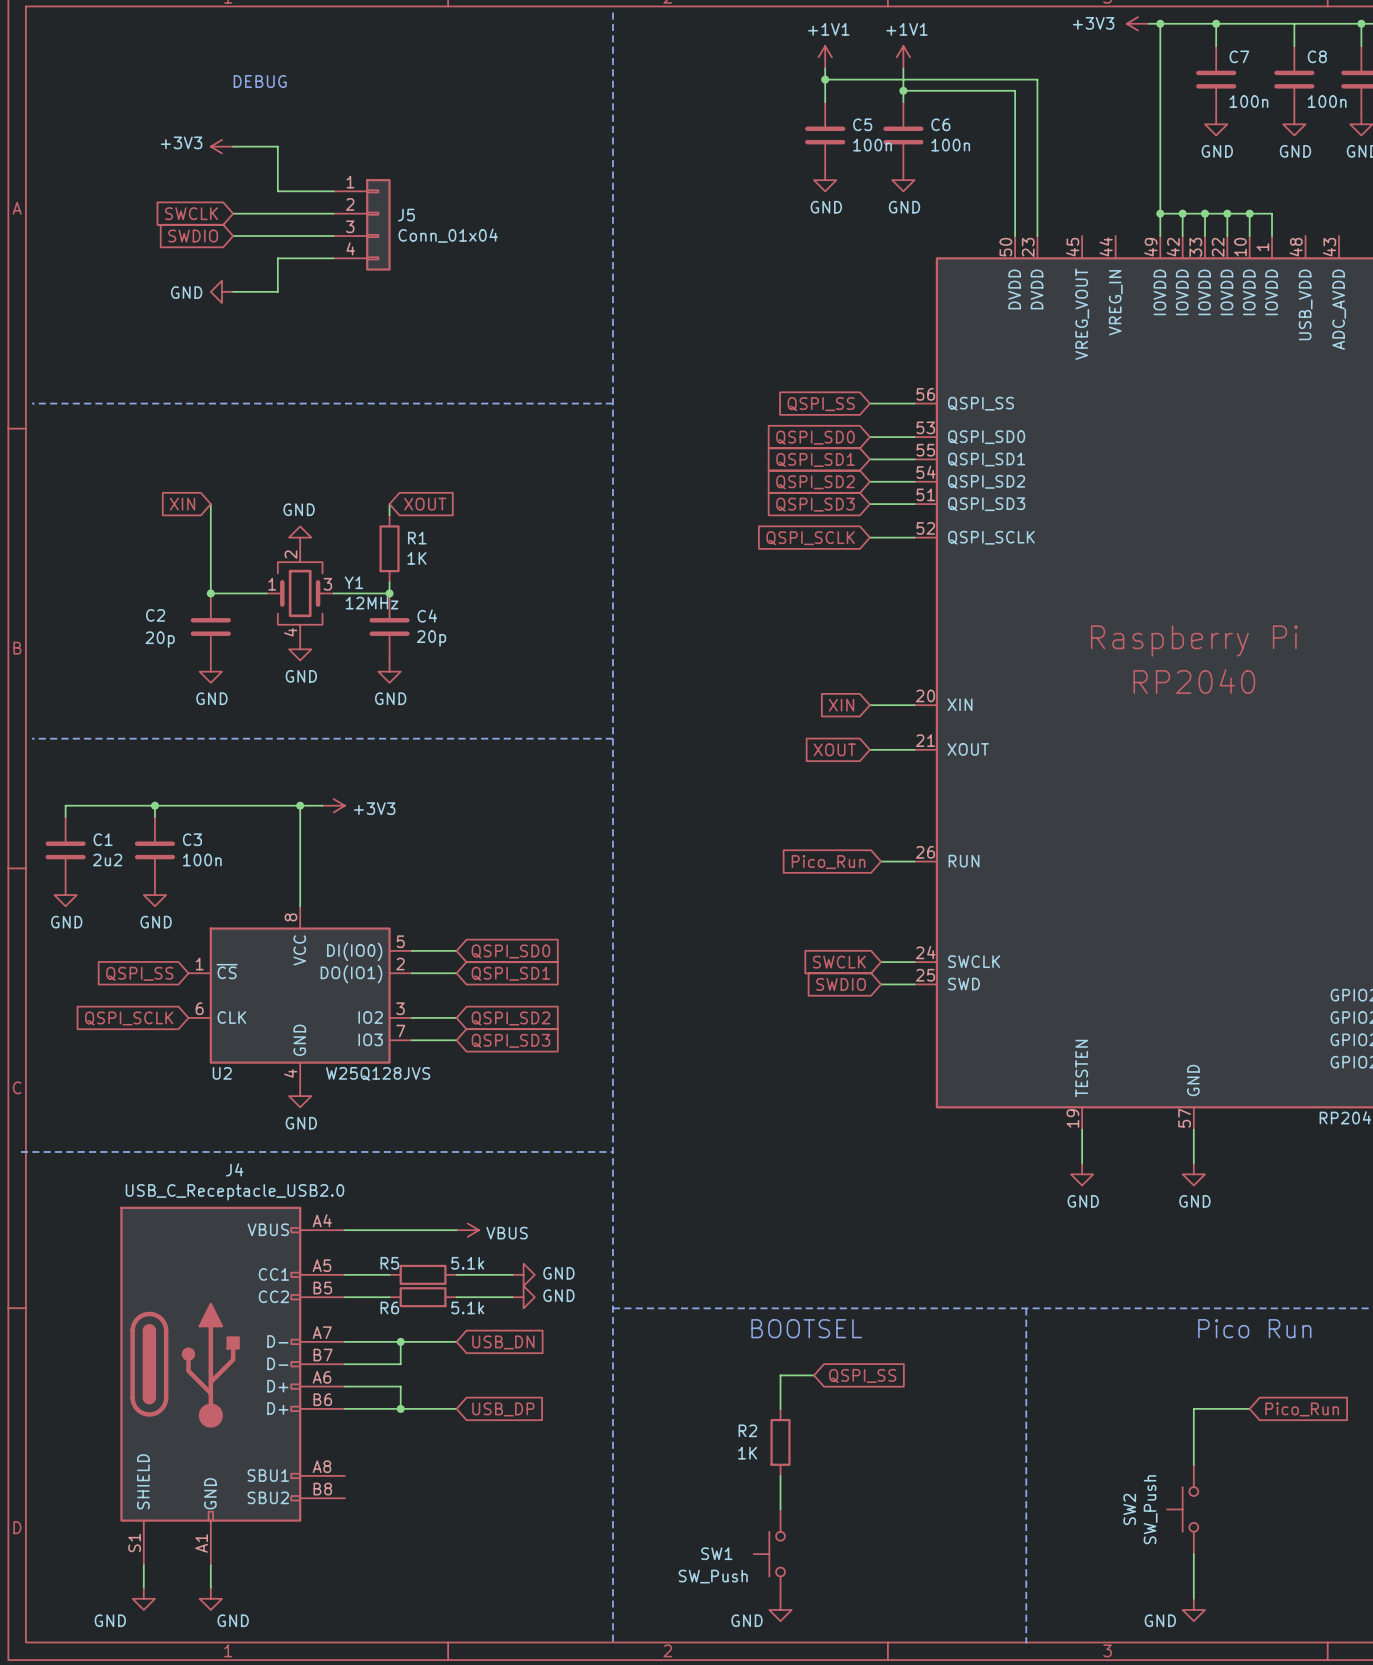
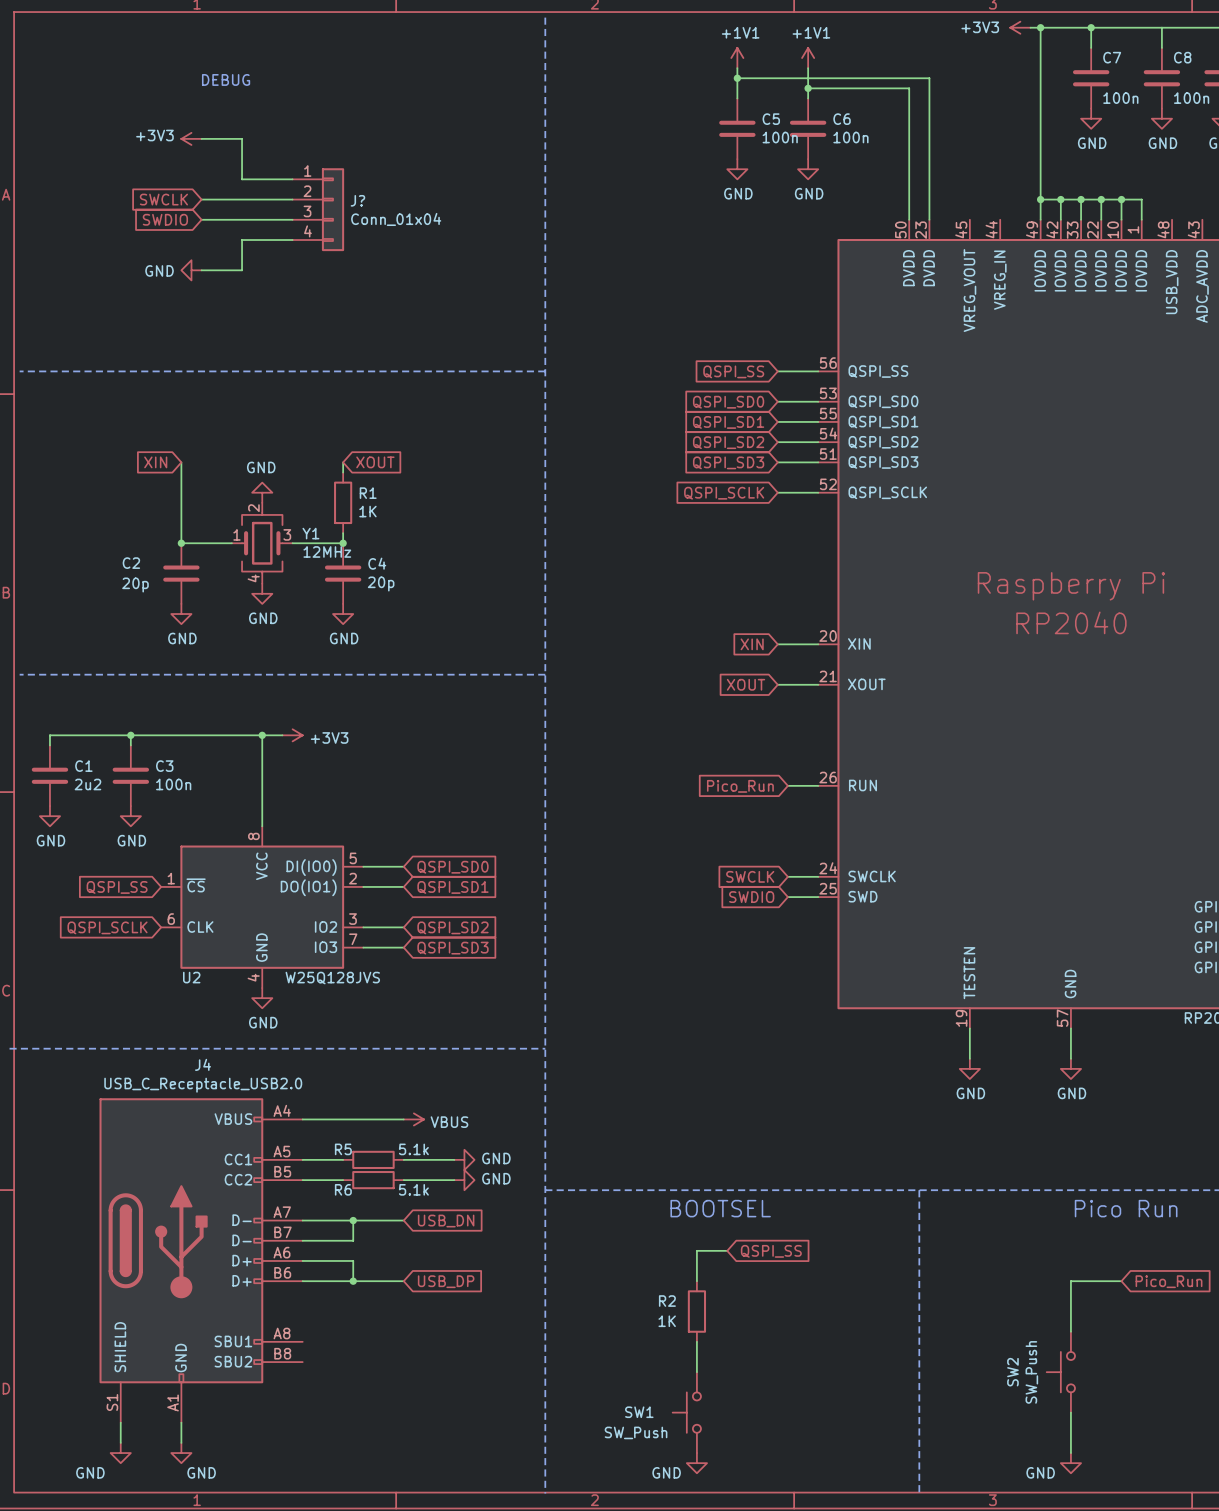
J5 name: J5 (406, 215) -> J? (357, 200)

